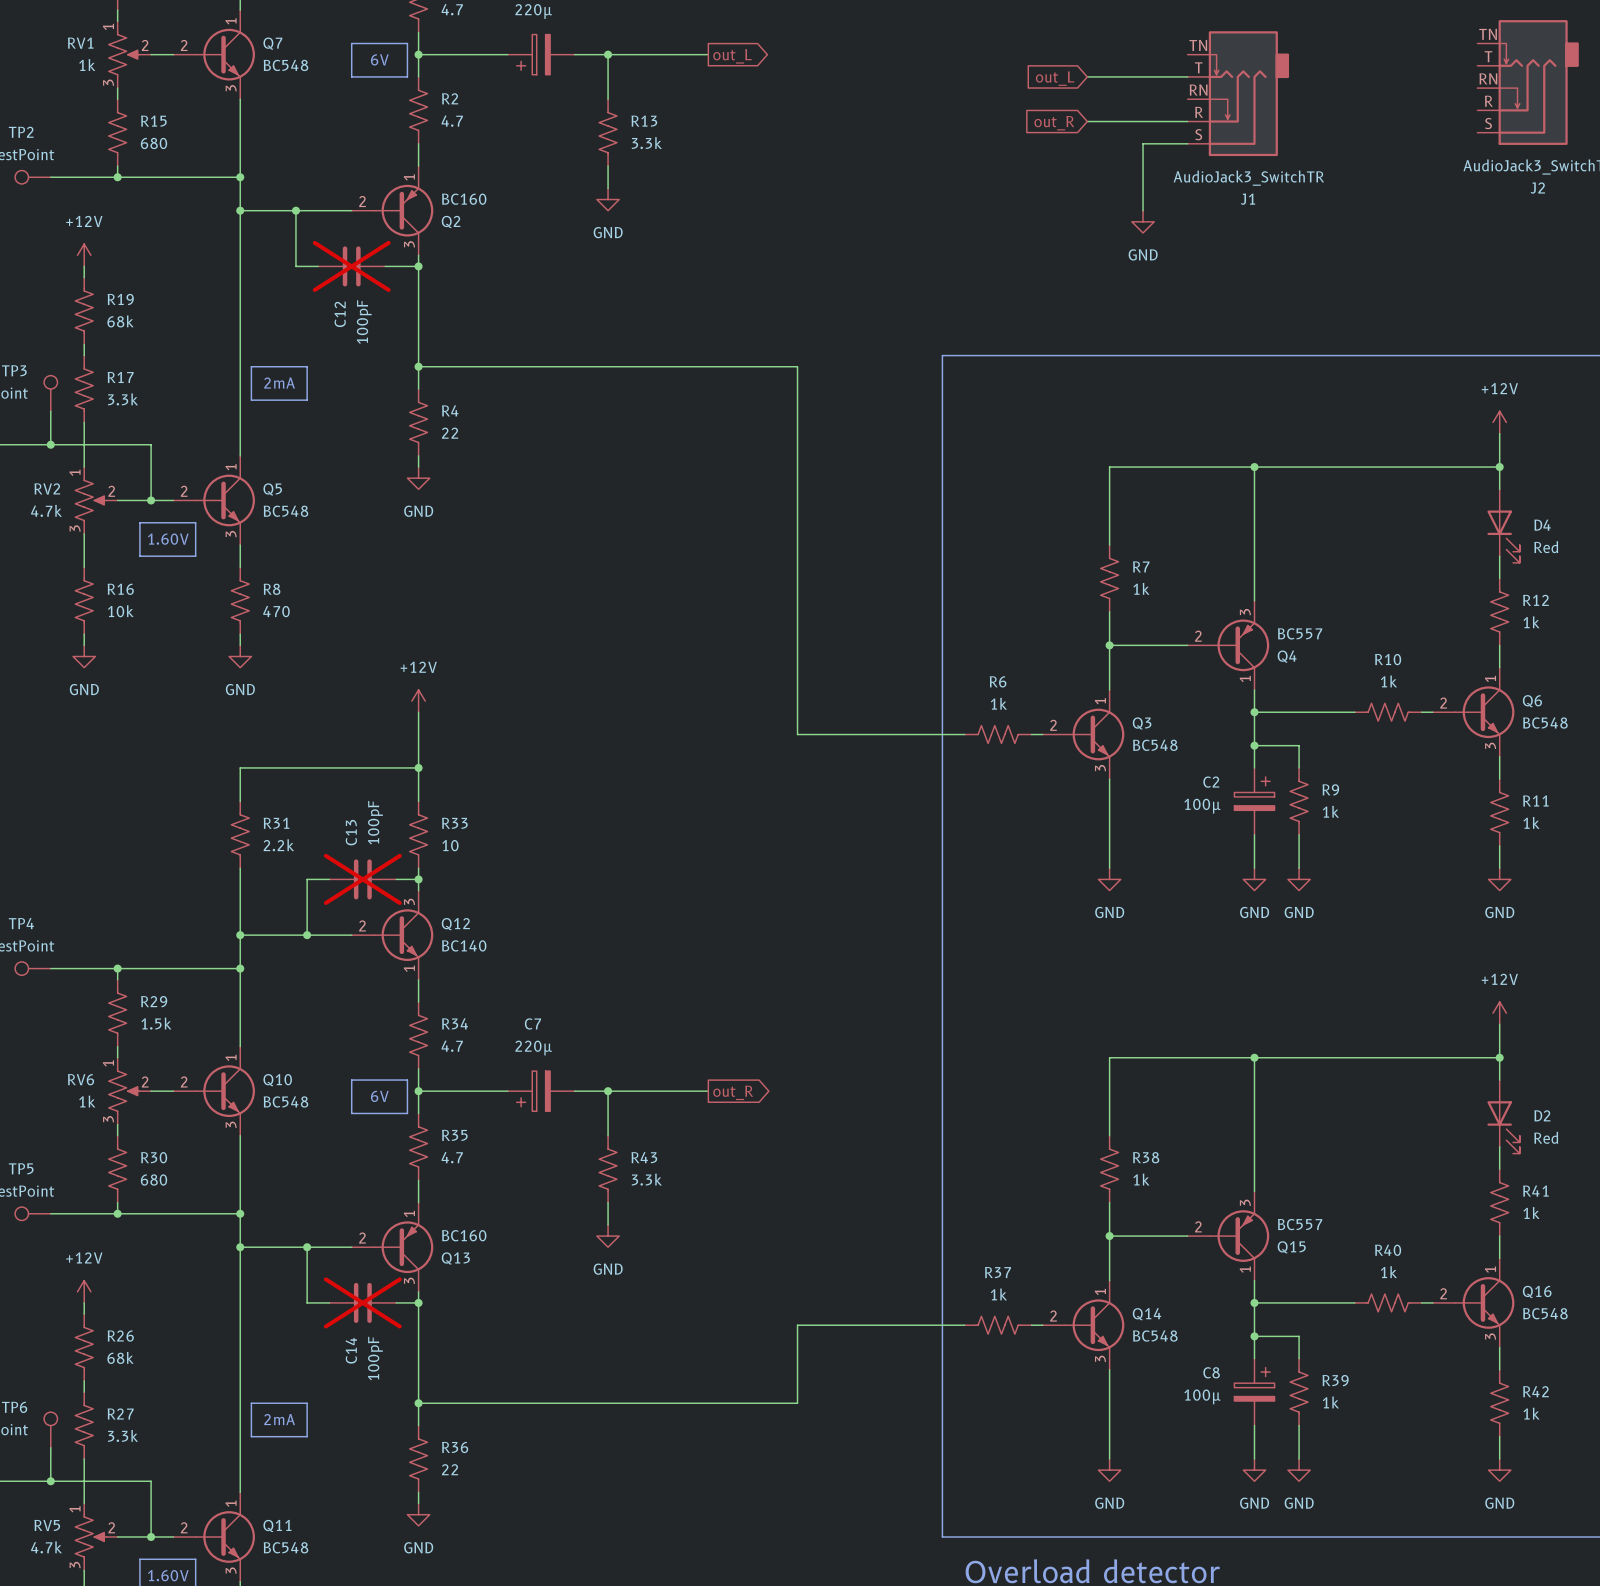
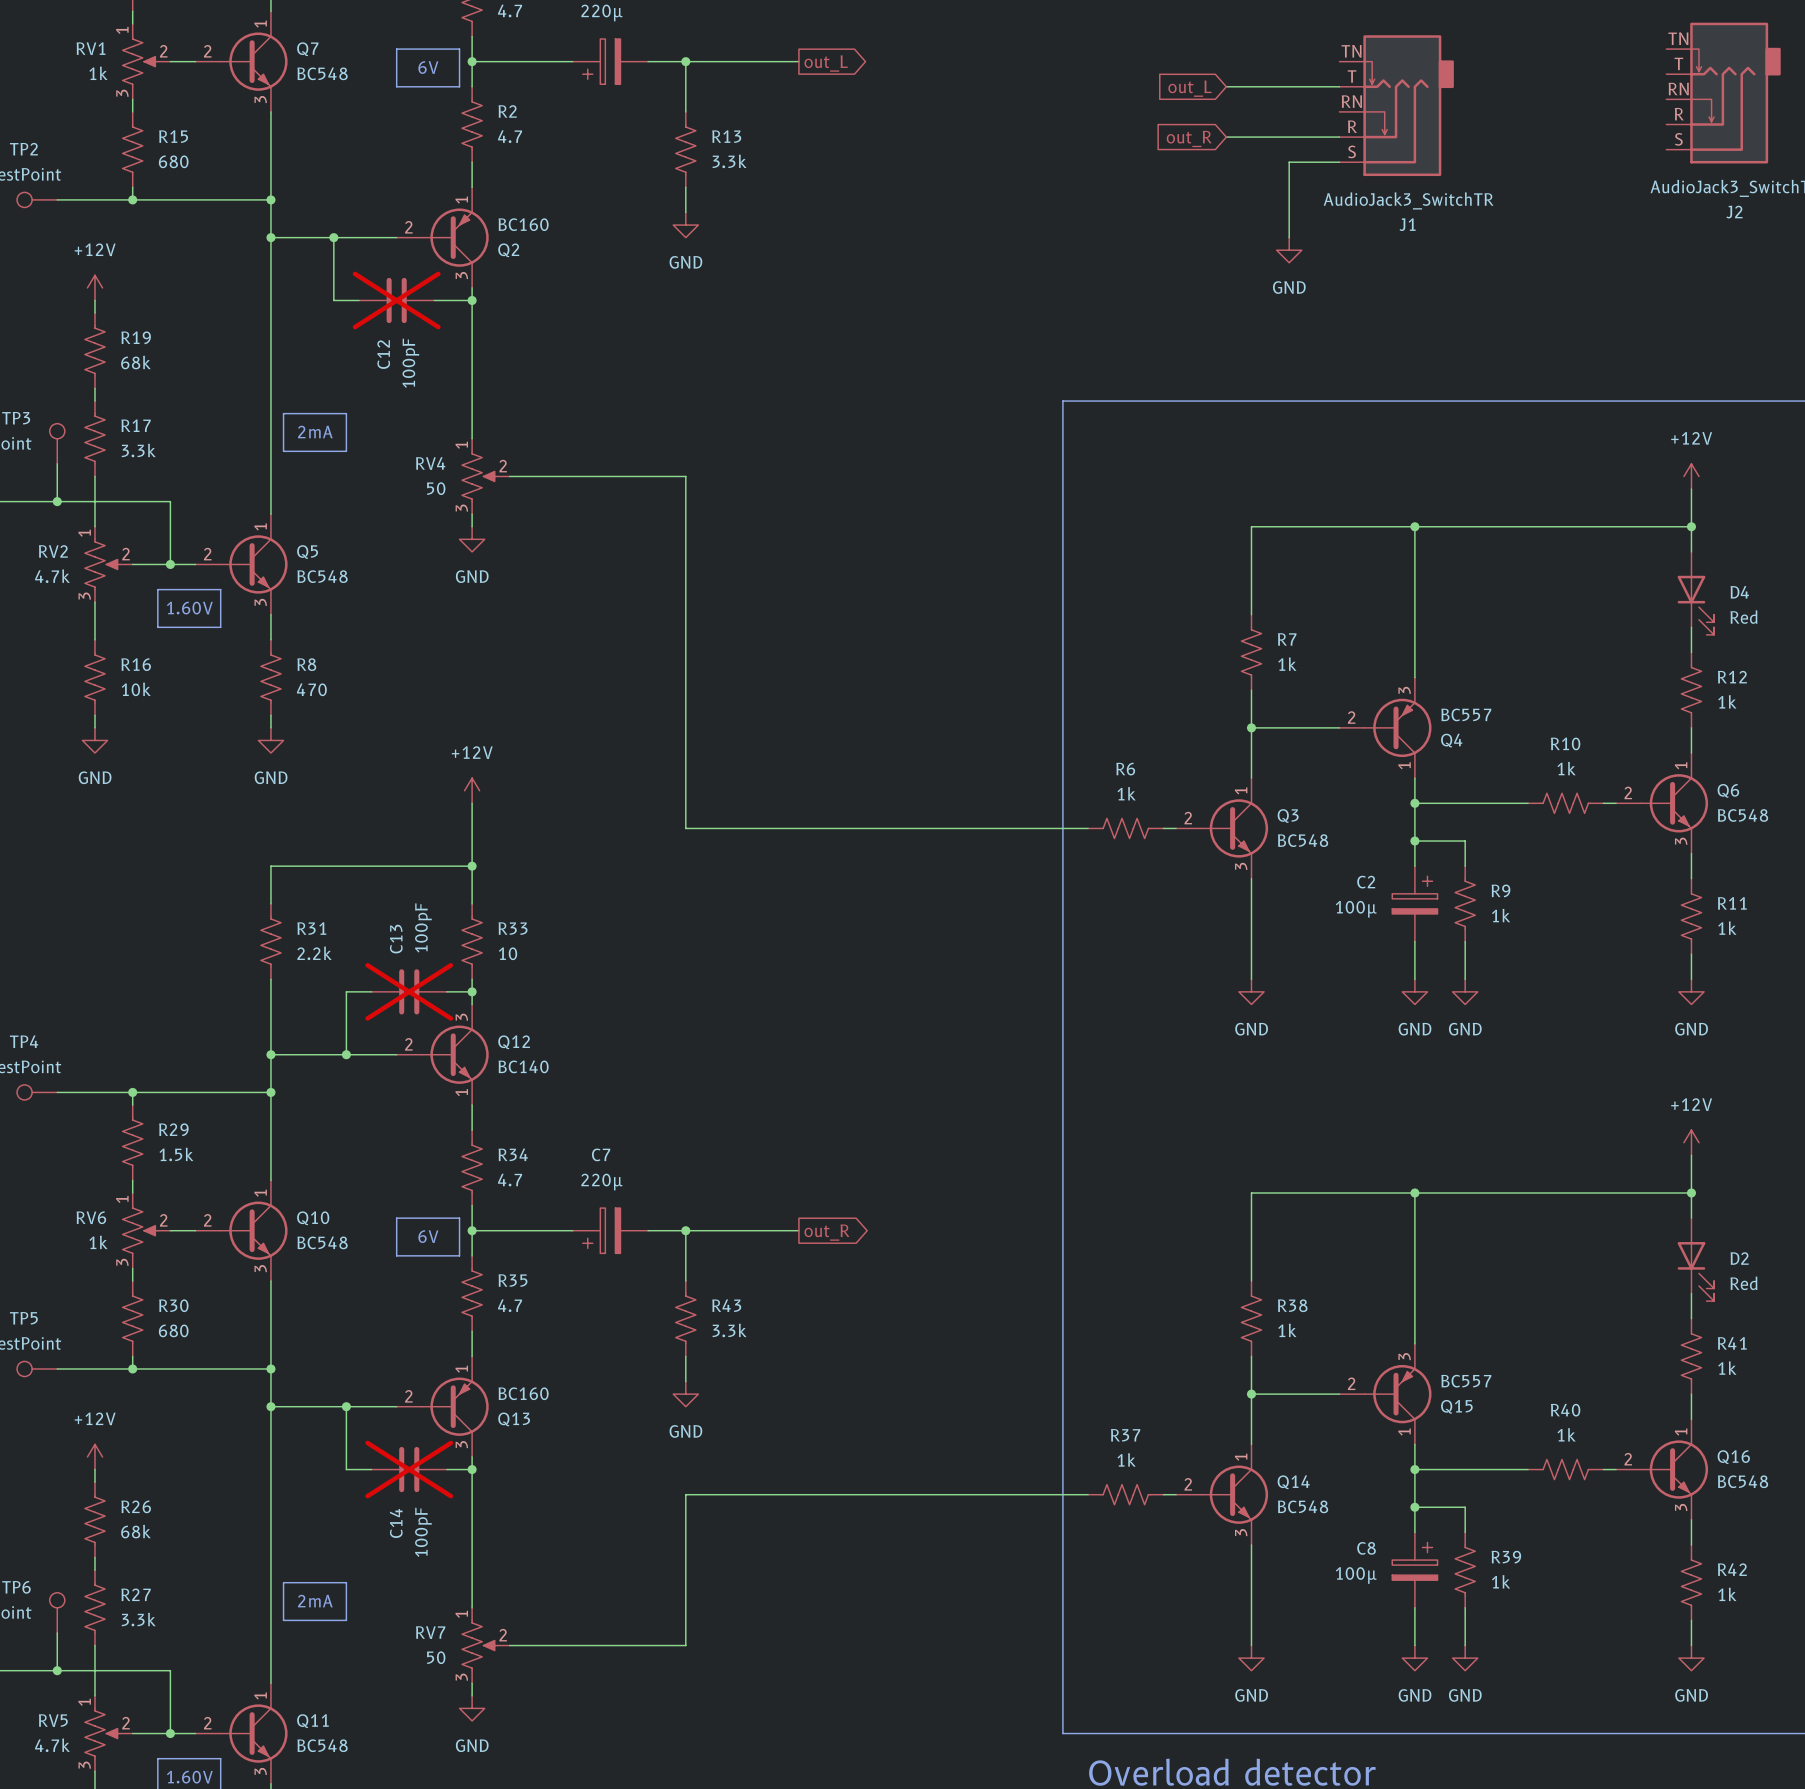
wire: (418, 366) (797, 366) (797, 734) -> (509, 476) (685, 476) (685, 828) (899, 828)
junction: (418, 366) -> none
R4: 22 (418, 422) -> none
RV4: none -> 50 (485, 476)
wire: (797, 1325) (797, 1403) (418, 1403) -> (899, 1494) (685, 1494) (685, 1645) (509, 1645)
junction: (418, 1403) -> none
R36: 22 (418, 1458) -> none
RV7: none -> 50 (485, 1645)

